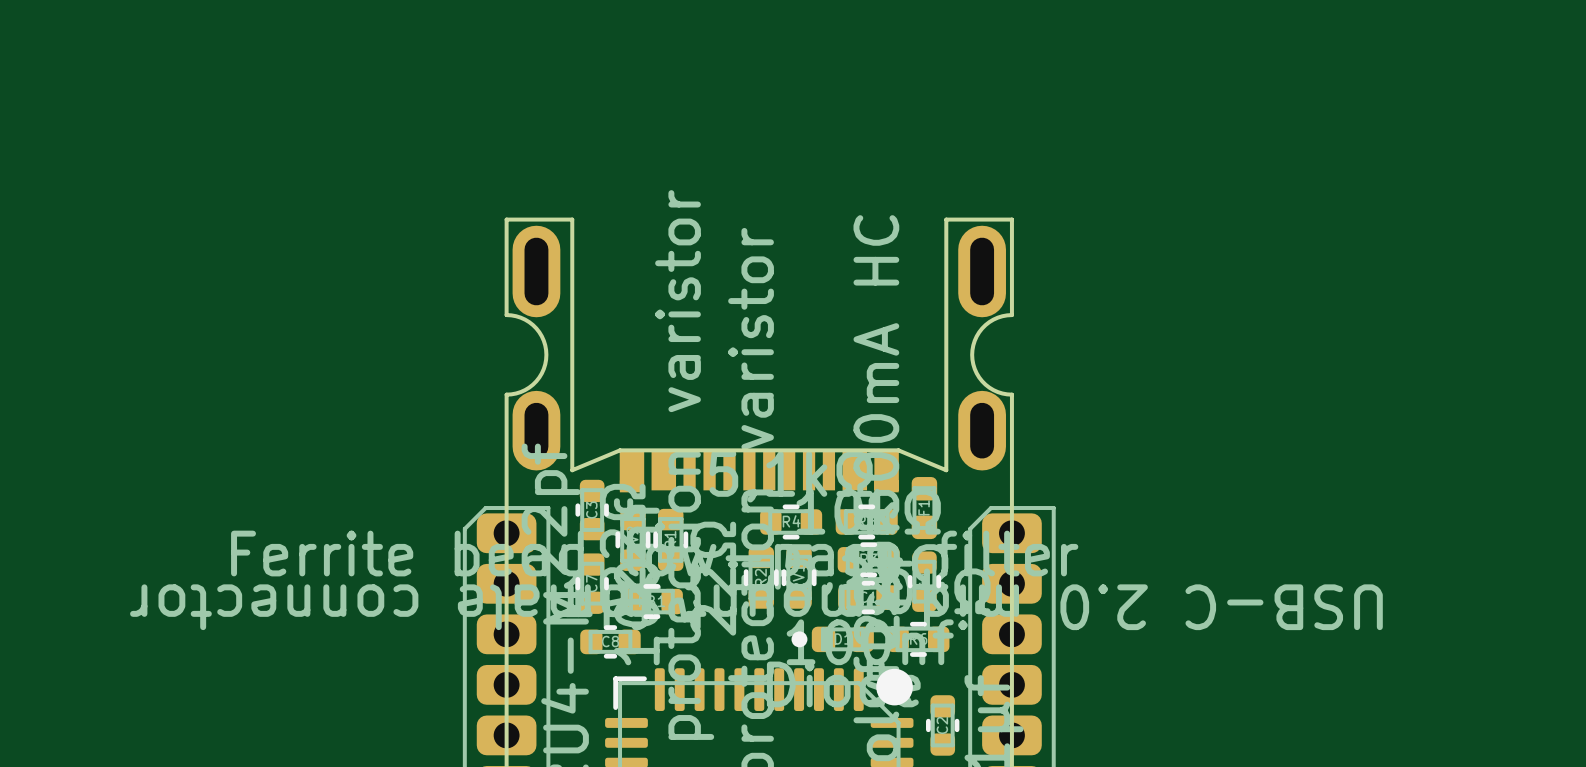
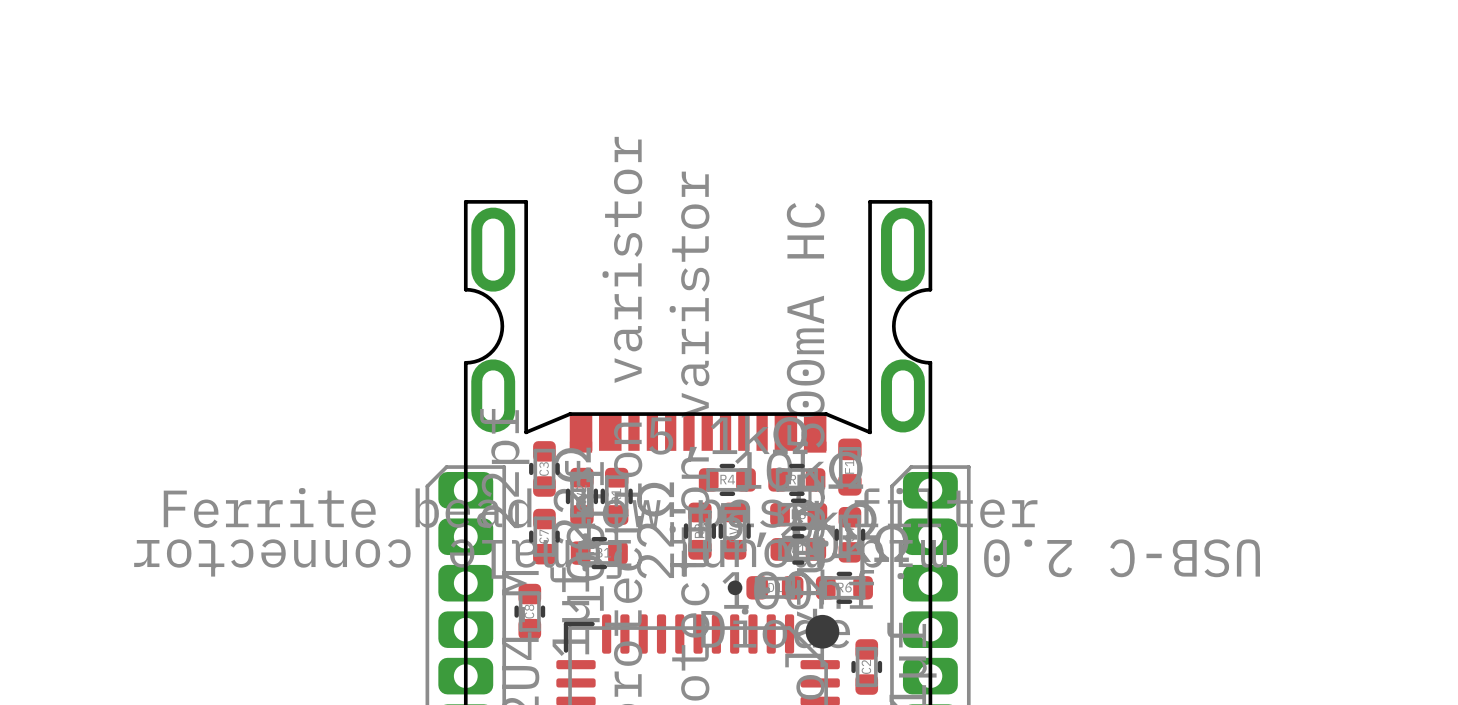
C8 rotation: 0° (610, 641) -> 90° clockwise (529, 611)
C8 position: (610, 641) -> (529, 611)

